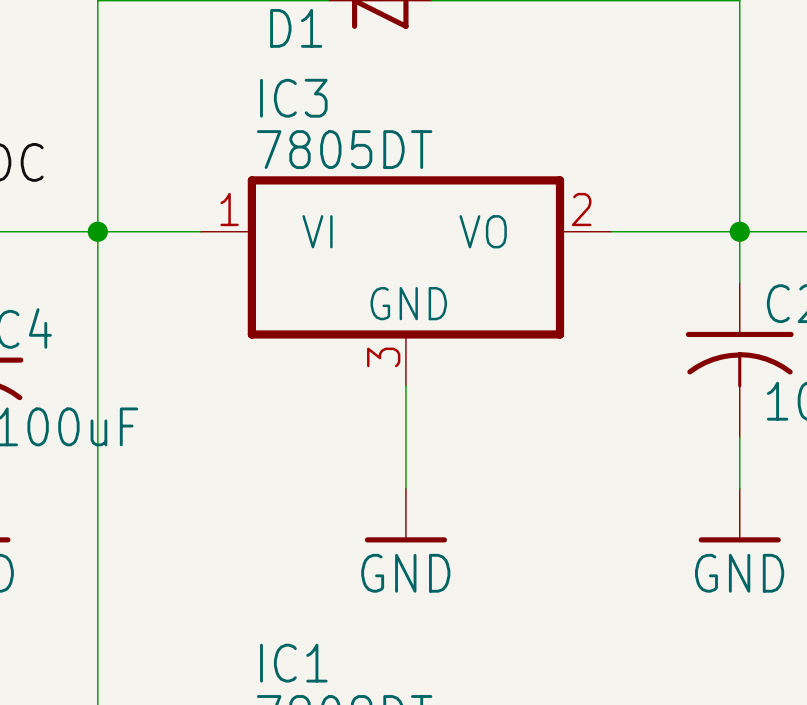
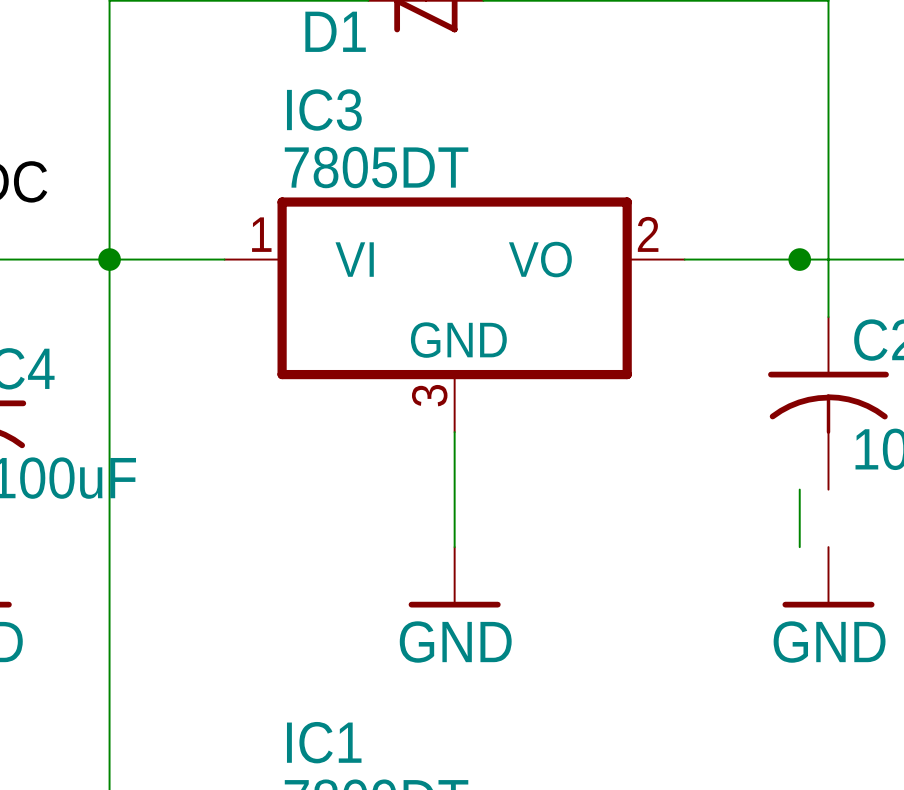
junction position: (739, 231) -> (799, 259)
wire: (739, 437) (739, 488) -> (799, 489) (799, 547)

